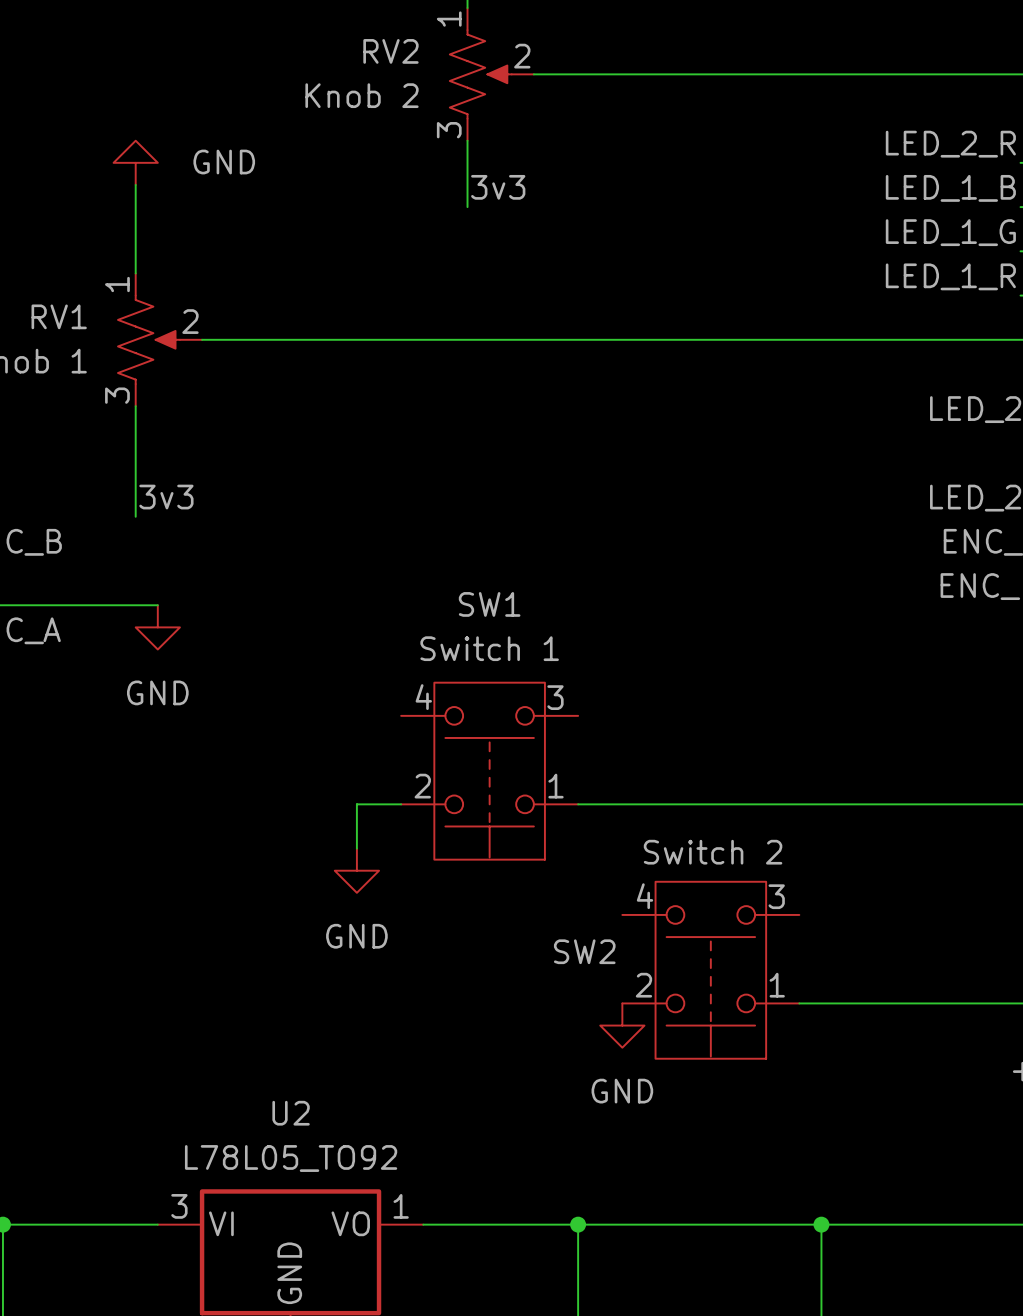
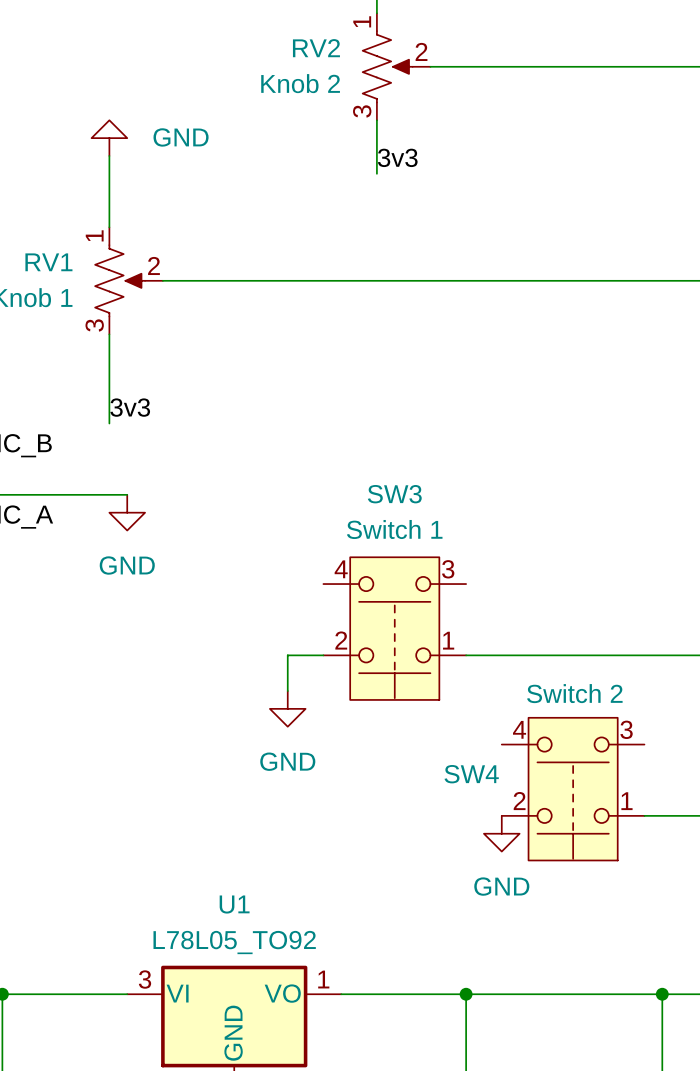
SW1 name: SW1 (489, 604) -> SW3 (394, 494)
SW2 name: SW2 (584, 951) -> SW4 (471, 774)
U2 name: U2 (291, 1113) -> U1 (234, 904)

